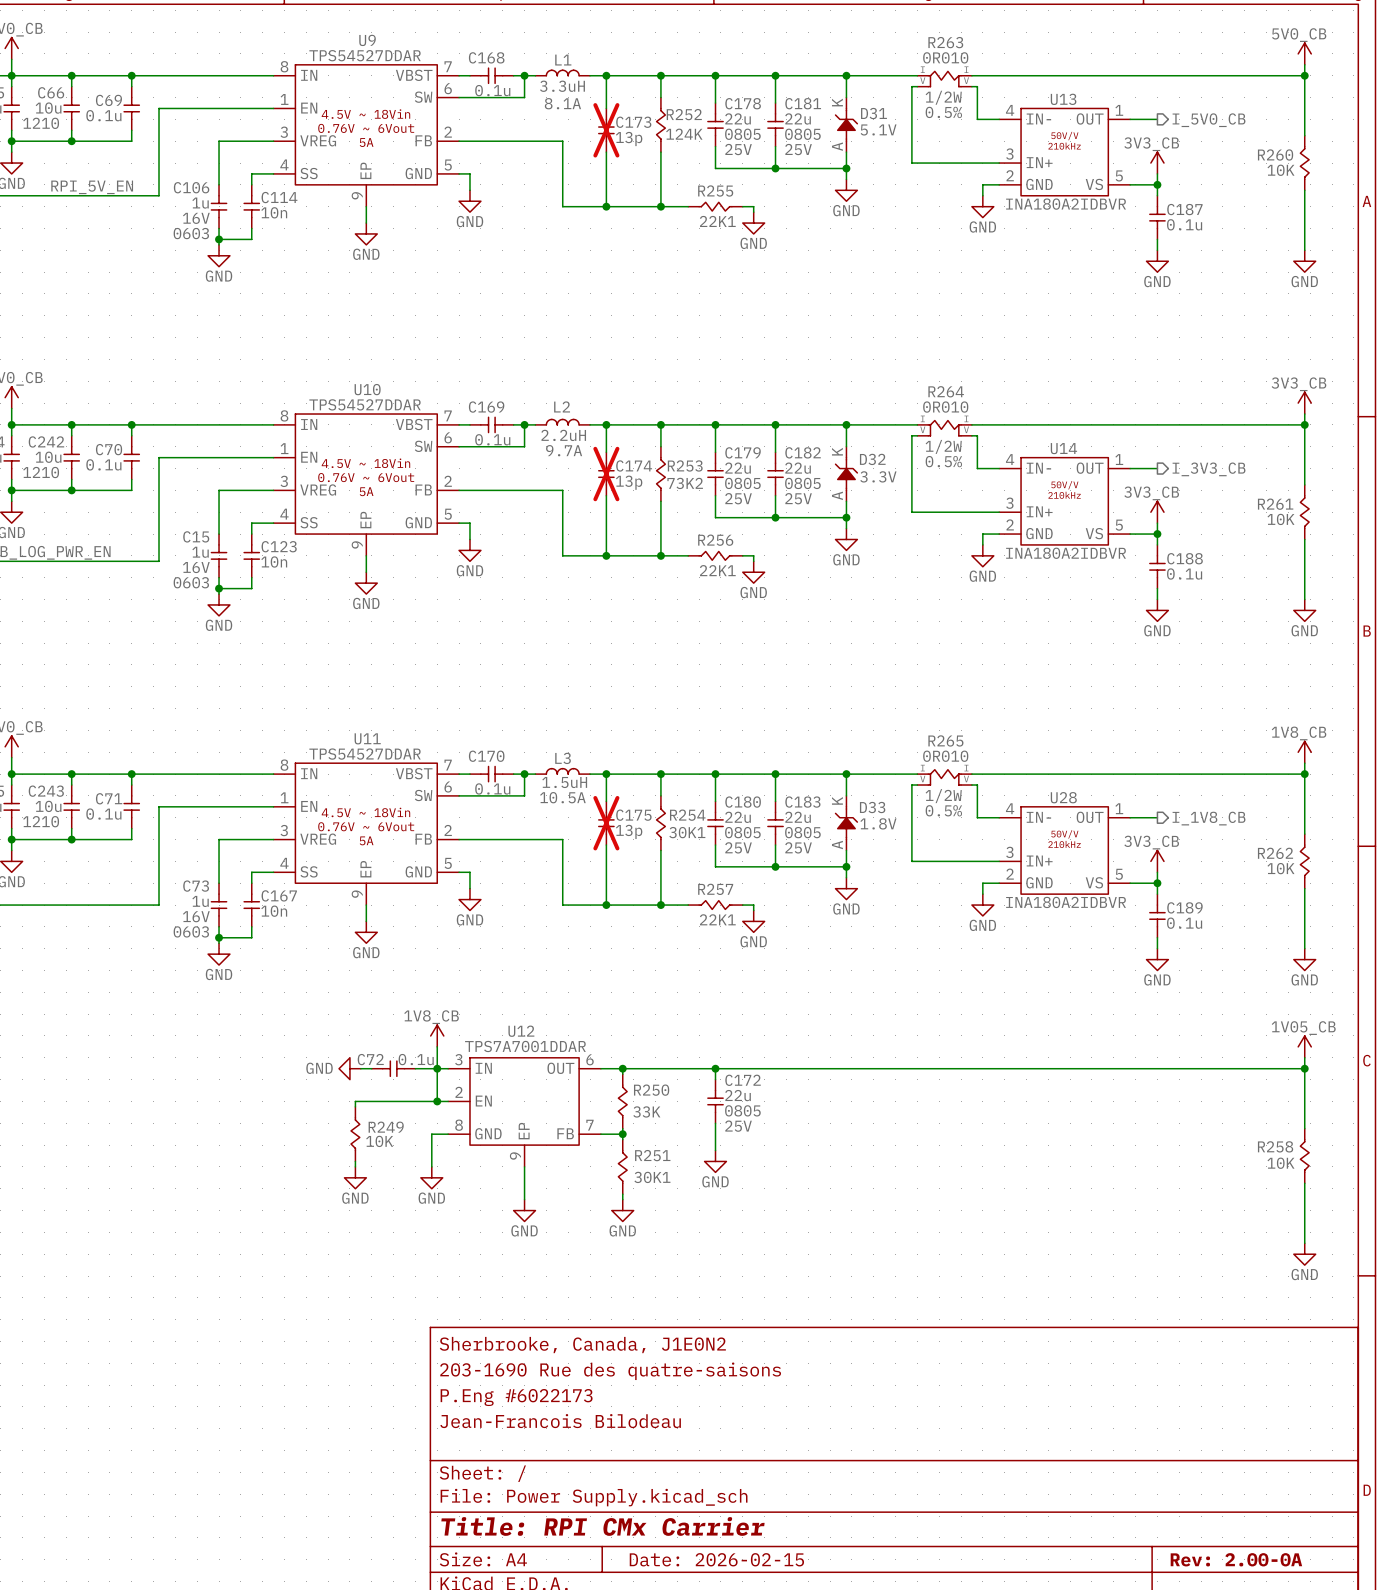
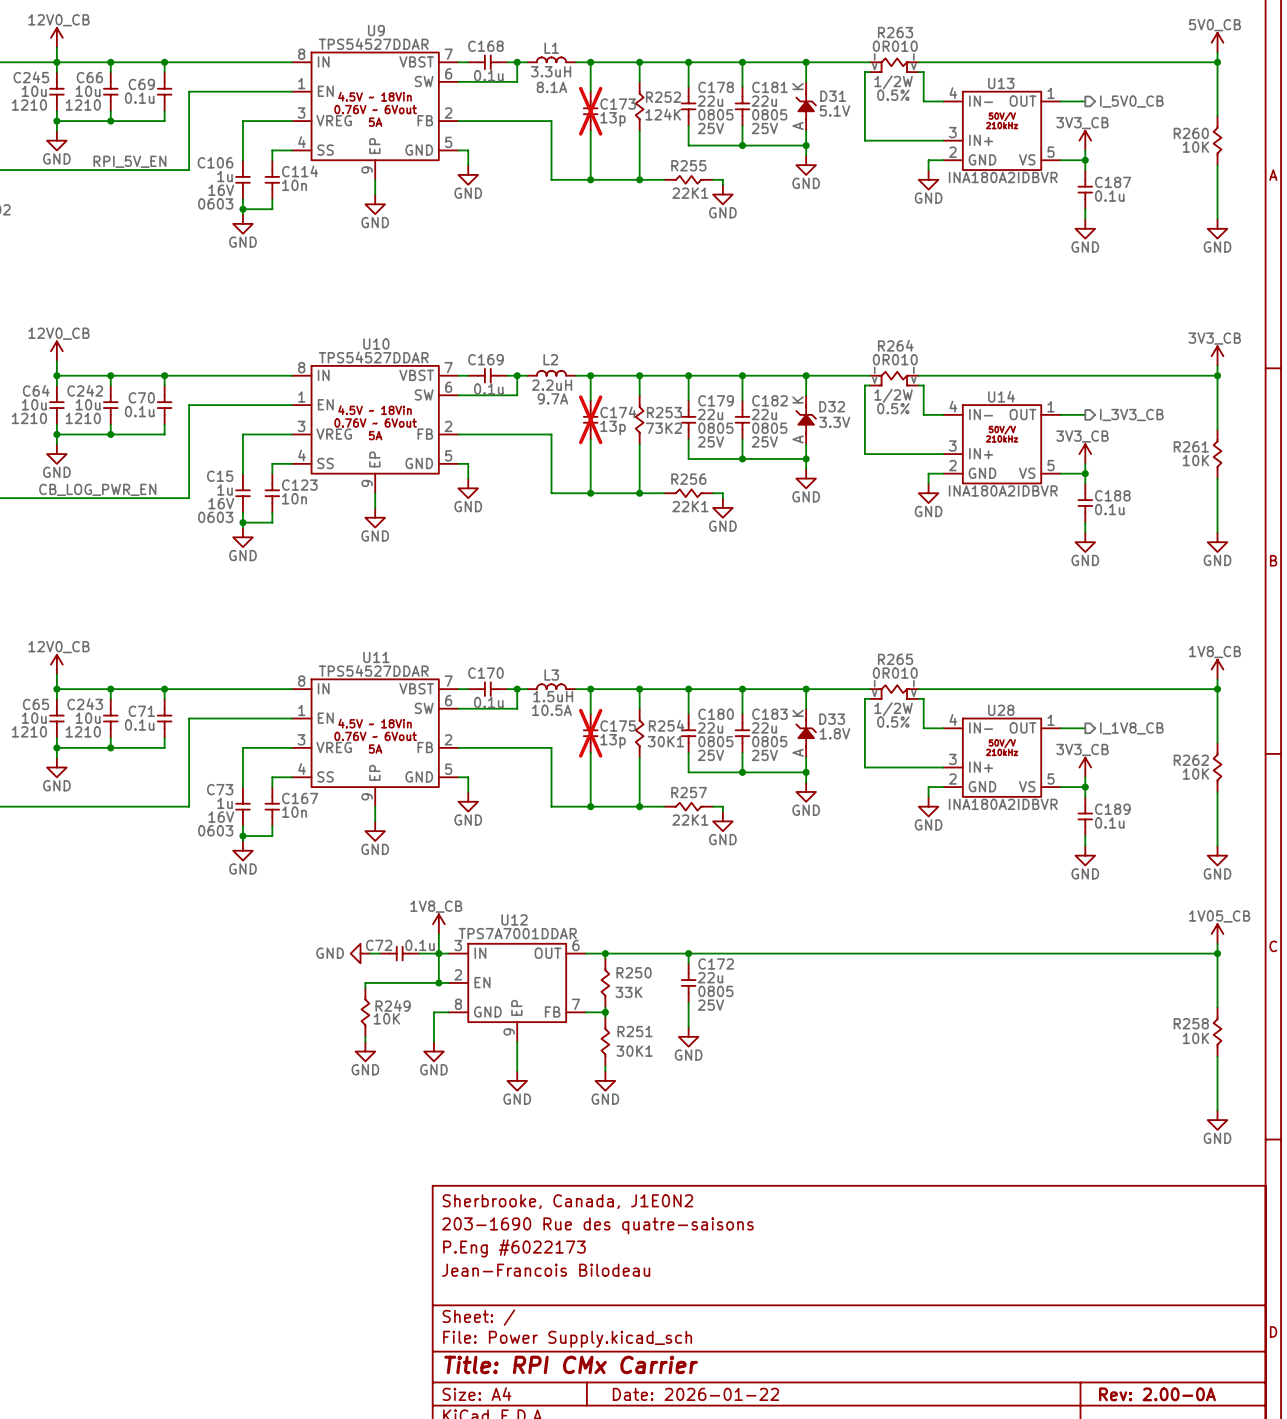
title block: Date: 2026-02-15 (716, 1559) -> Date: 2026-01-22 (695, 1394)

